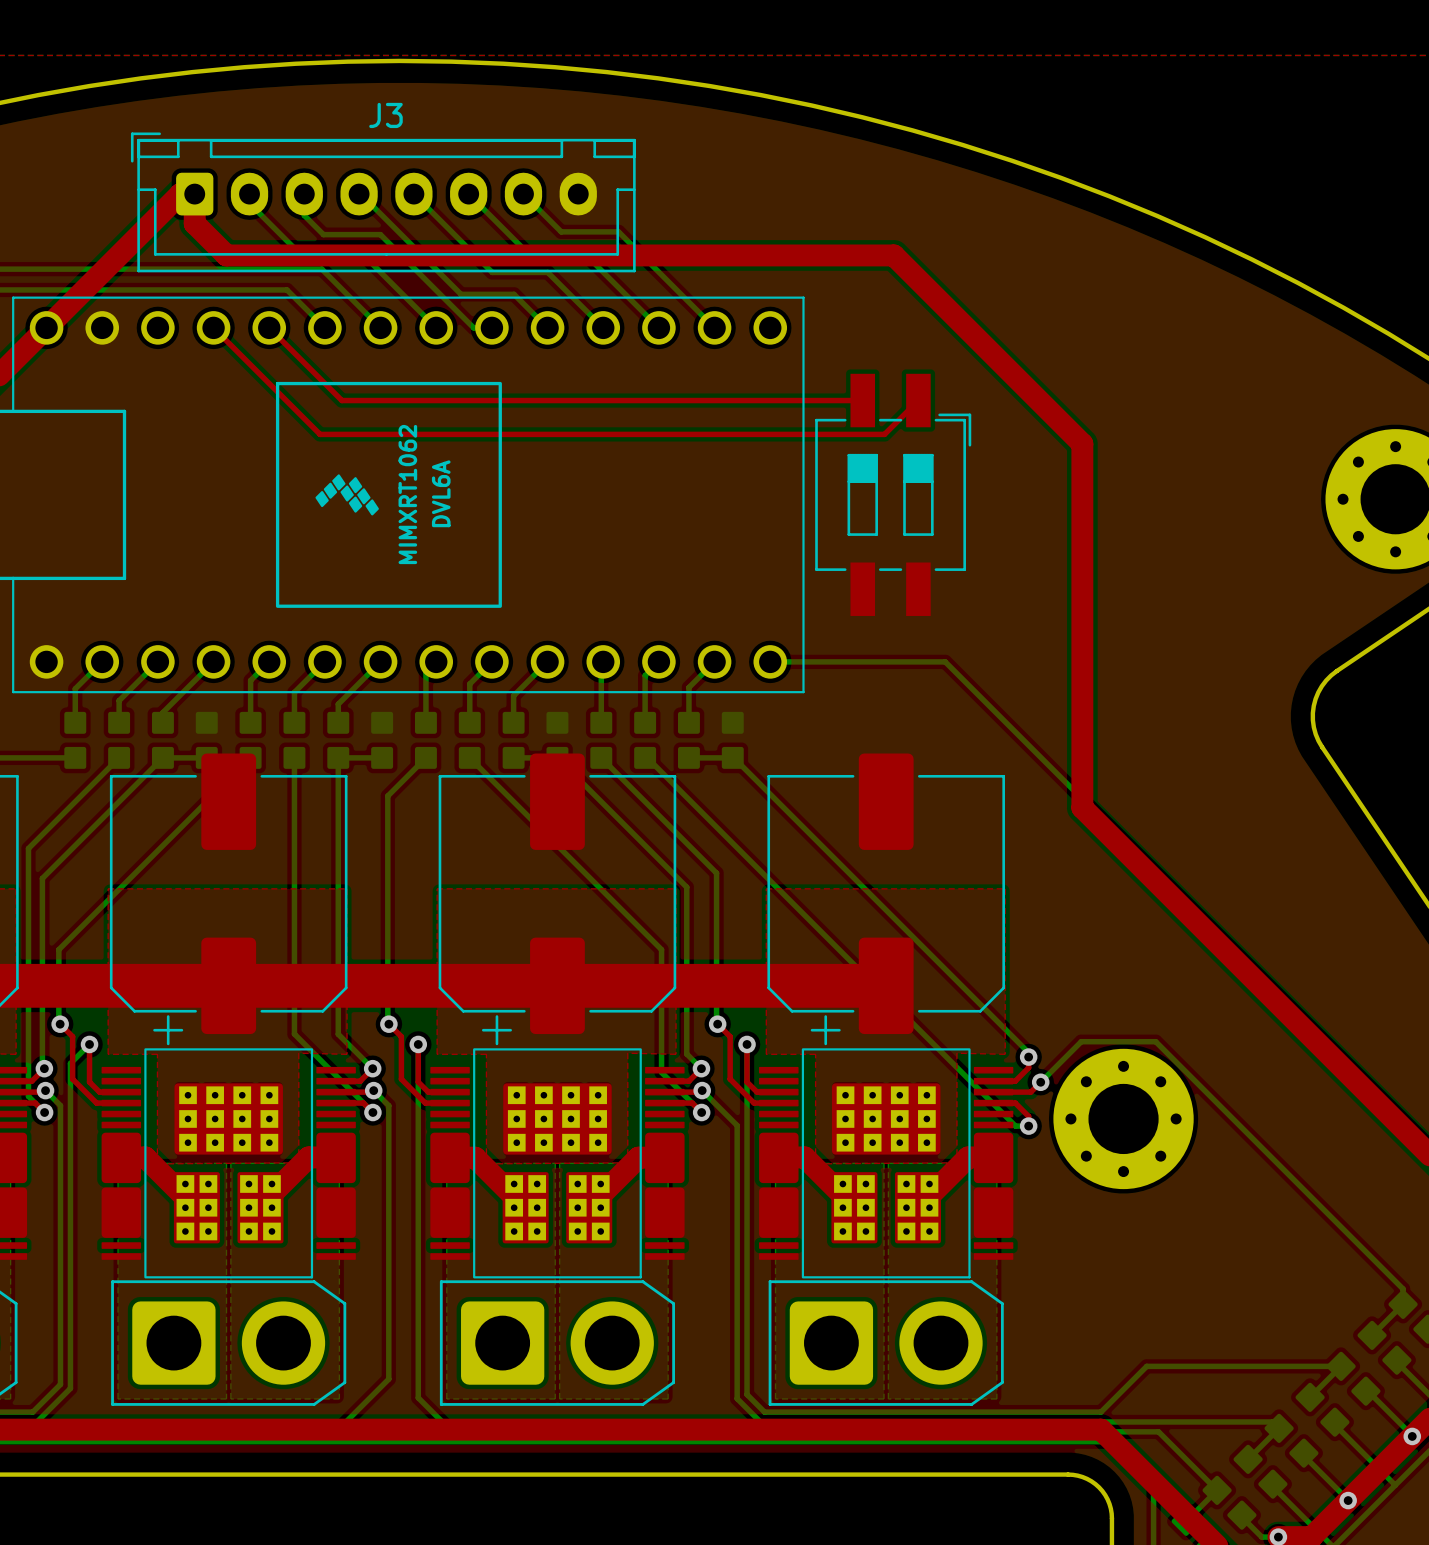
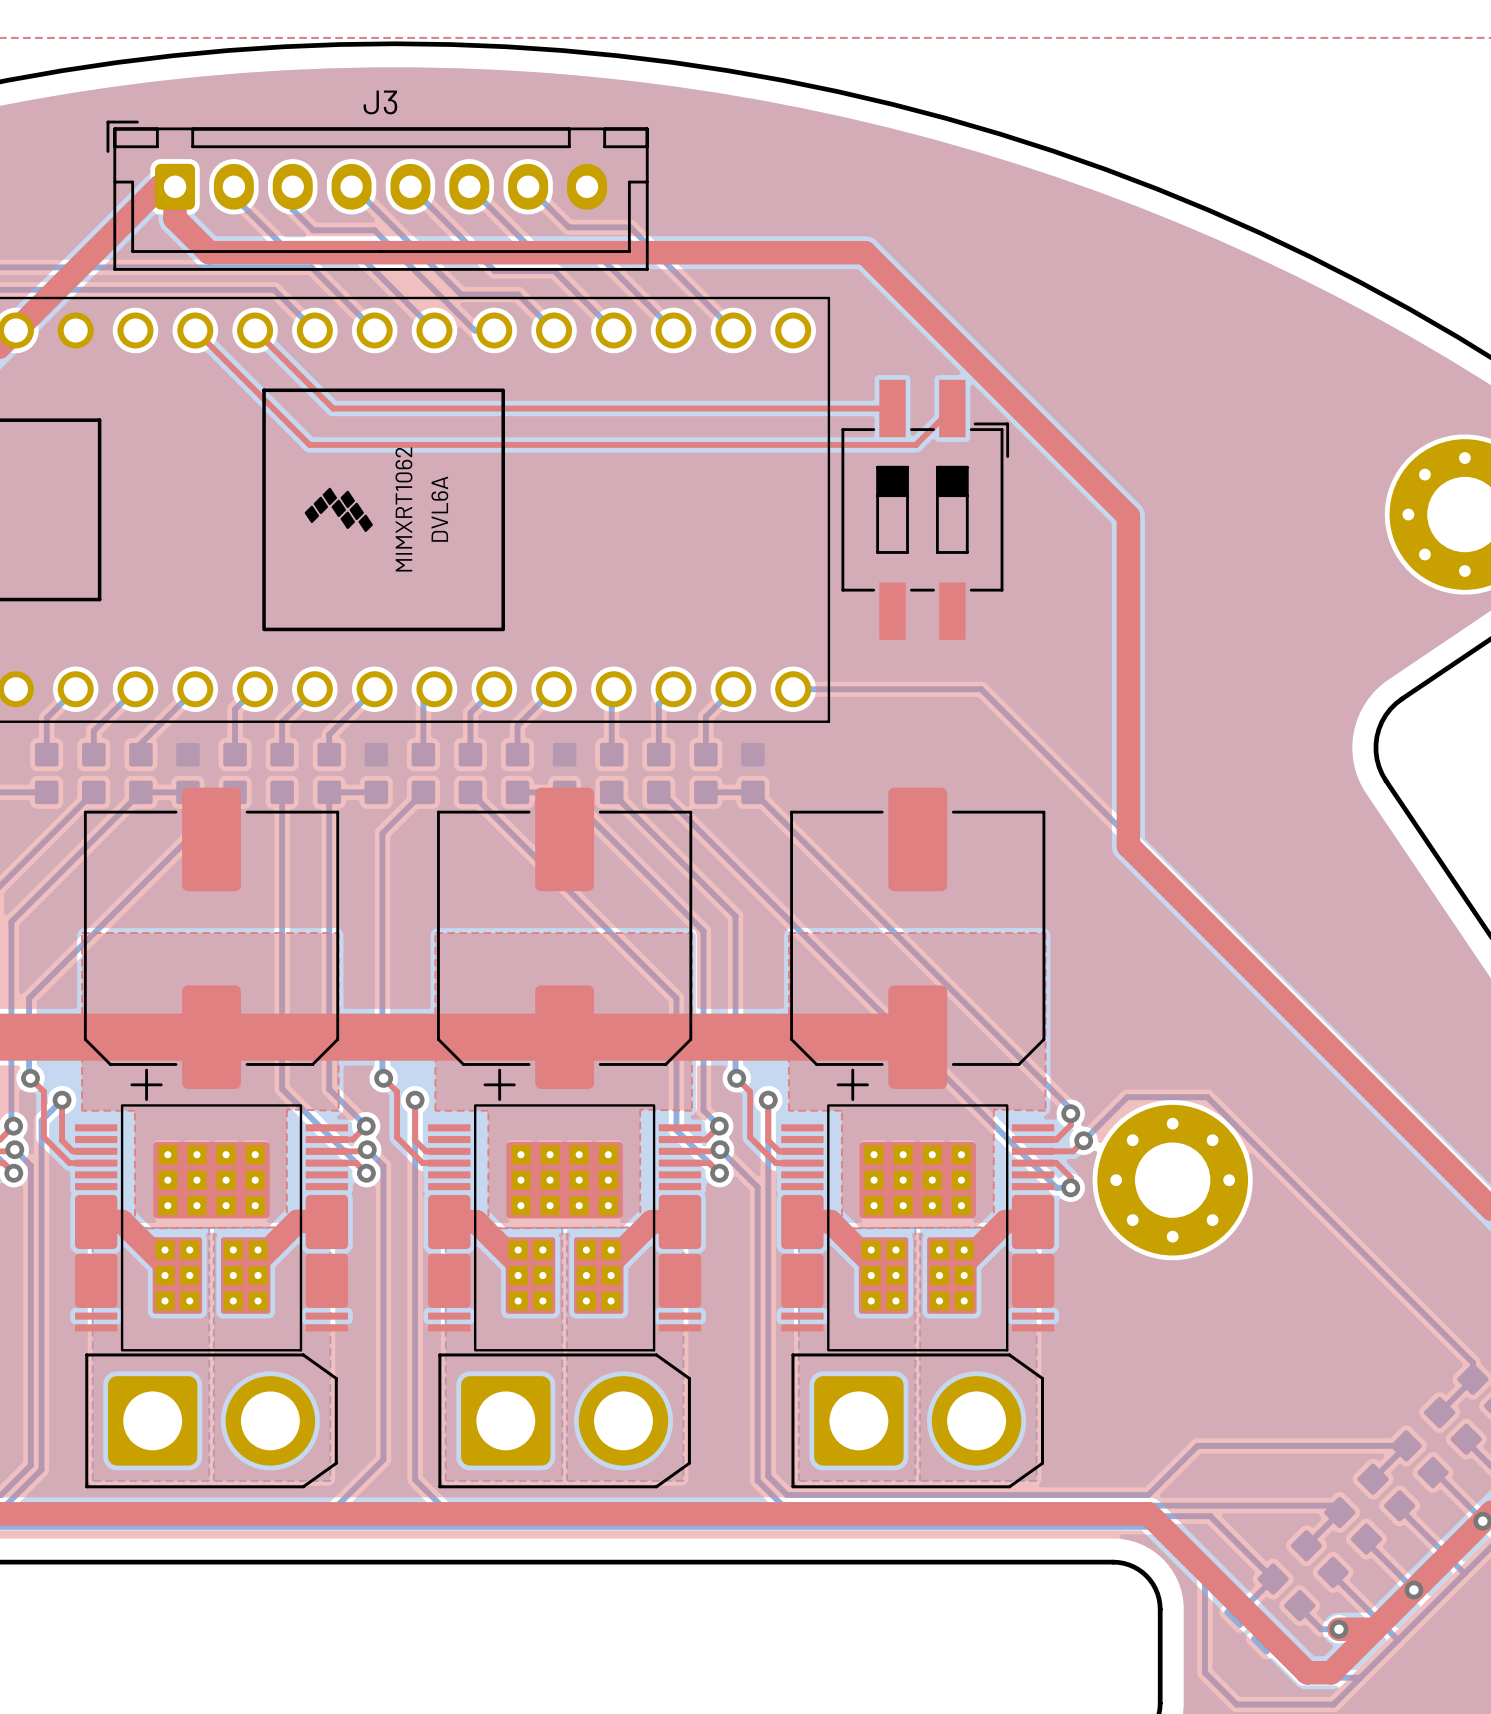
top track: (836, 255) (893, 255) (1082, 443) (1082, 500) -> (864, 252) (1128, 516)

